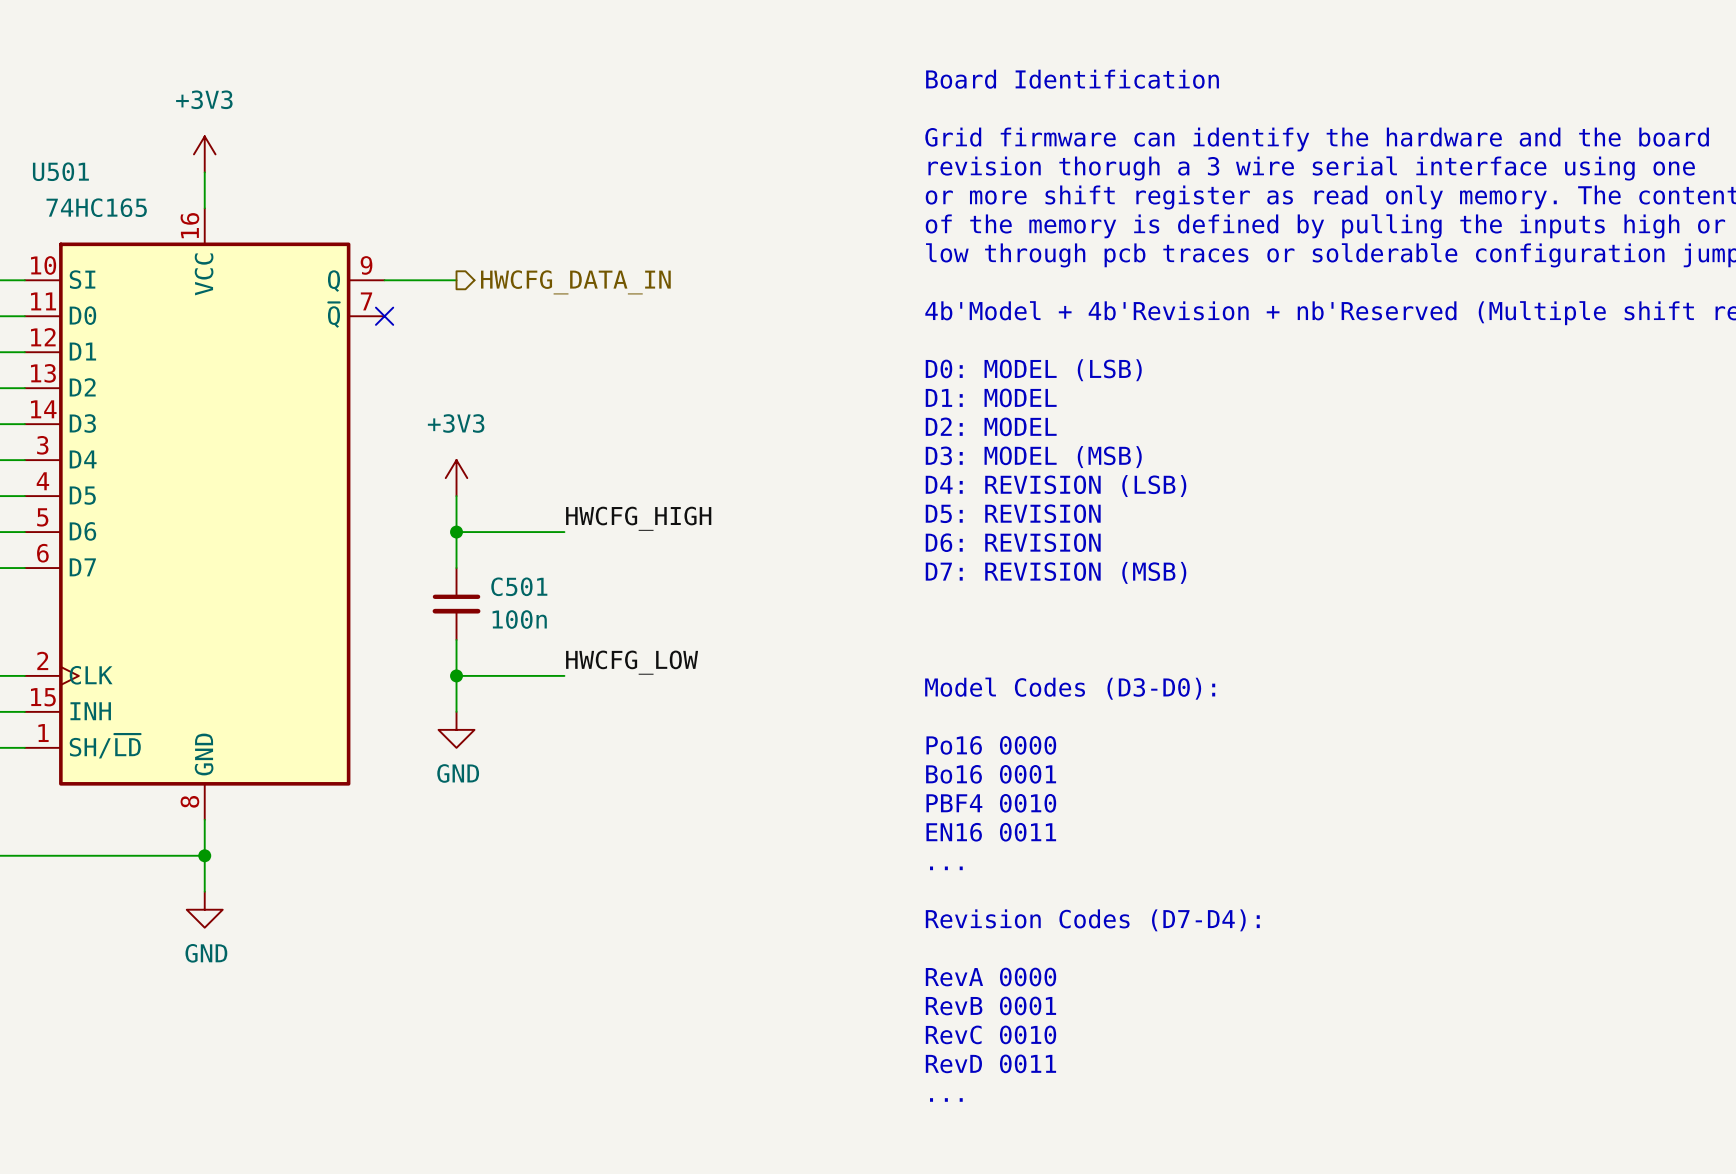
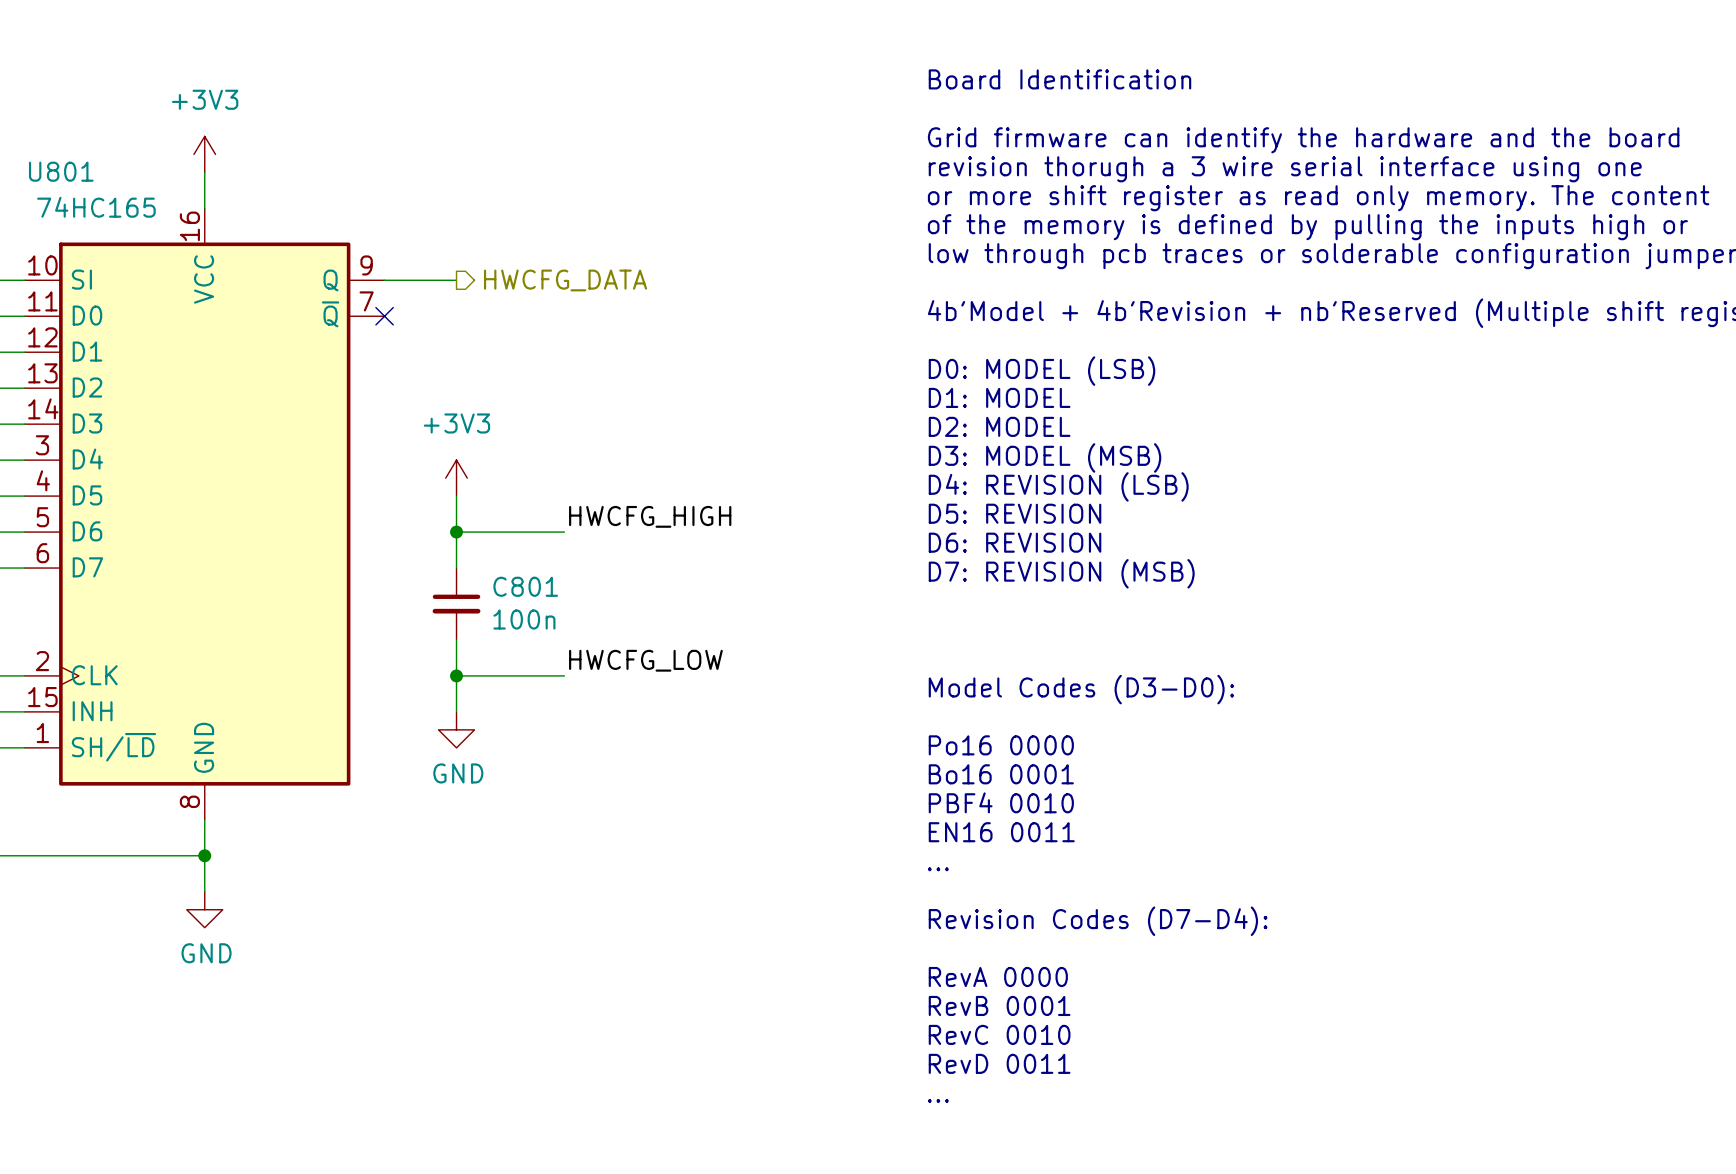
U501 name: U501 (60, 171) -> U801 (61, 171)
hierarchical label: HWCFG_DATA_IN (575, 282) -> HWCFG_DATA (565, 280)
C501 name: C501 (519, 586) -> C801 (525, 586)

